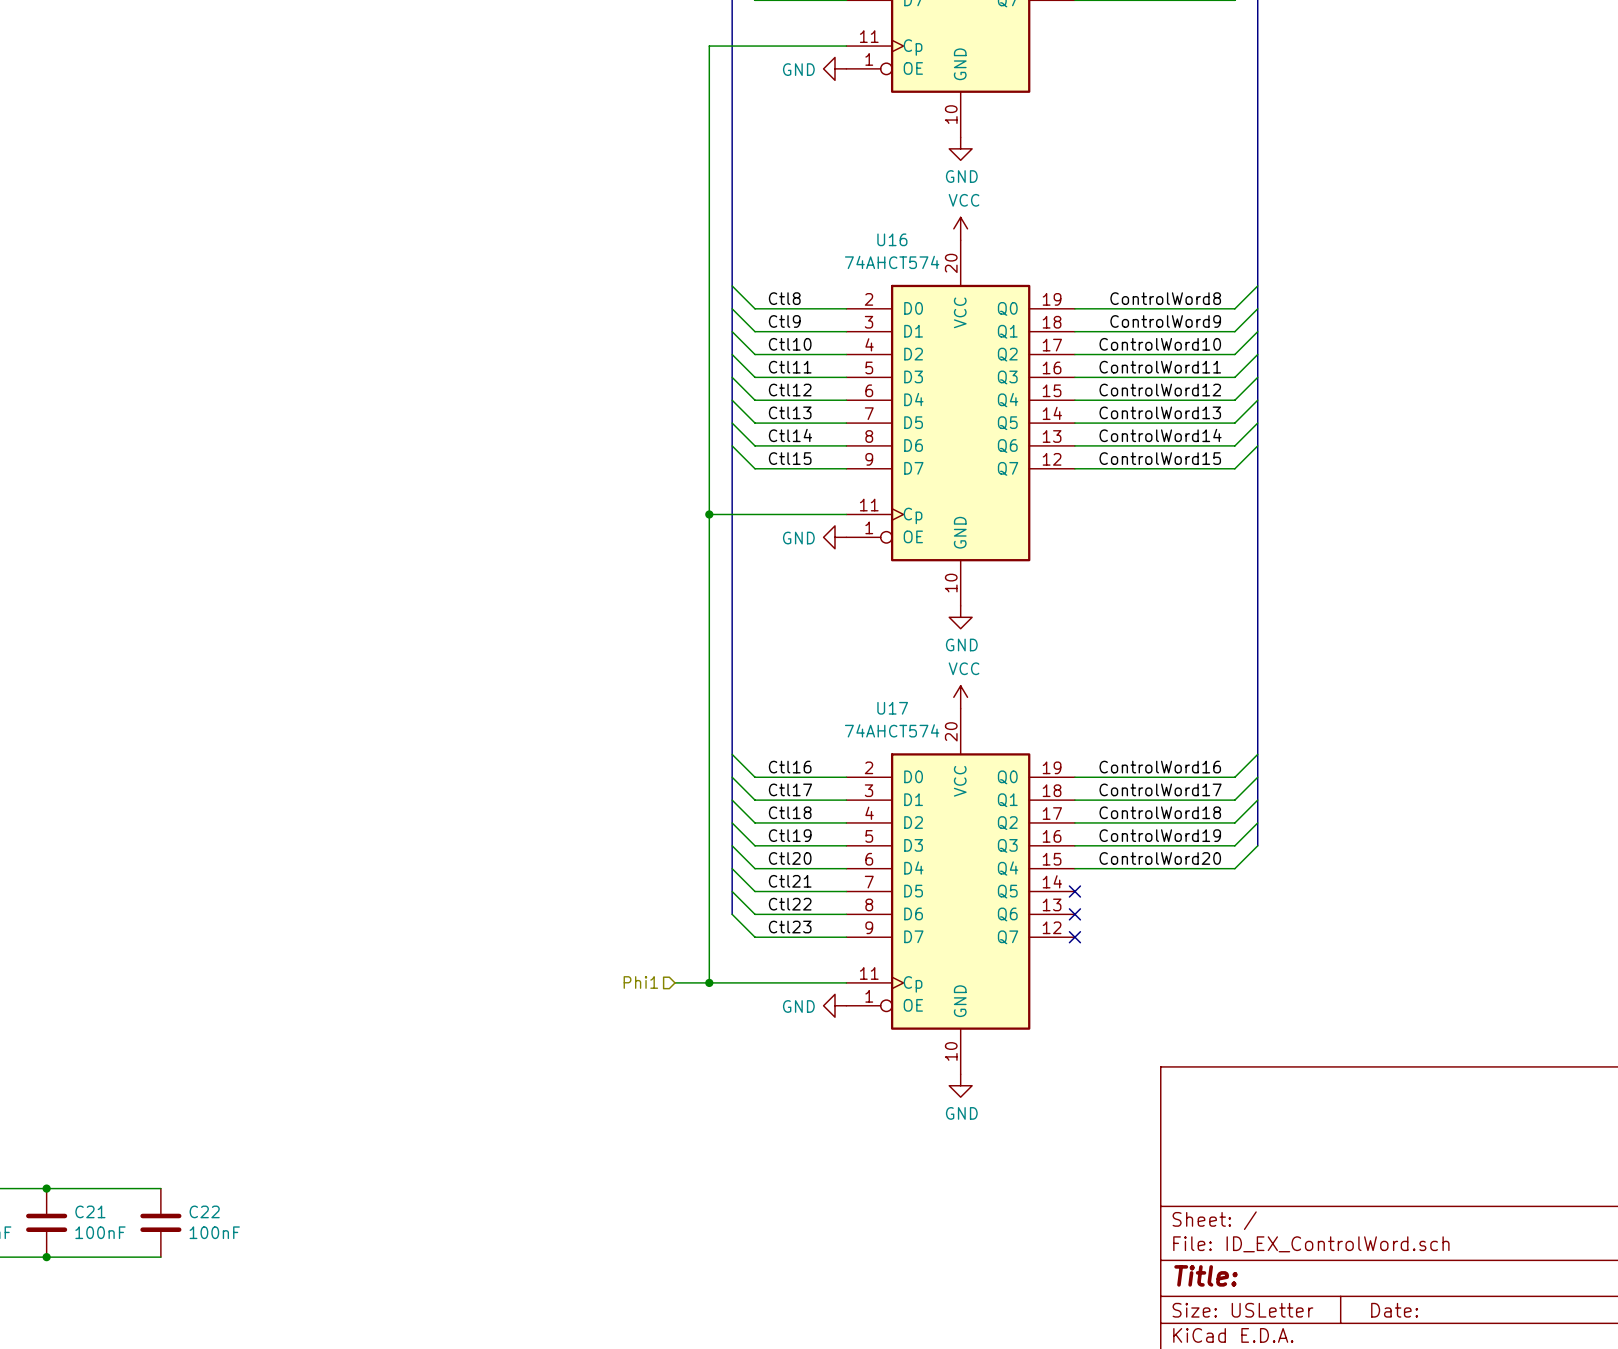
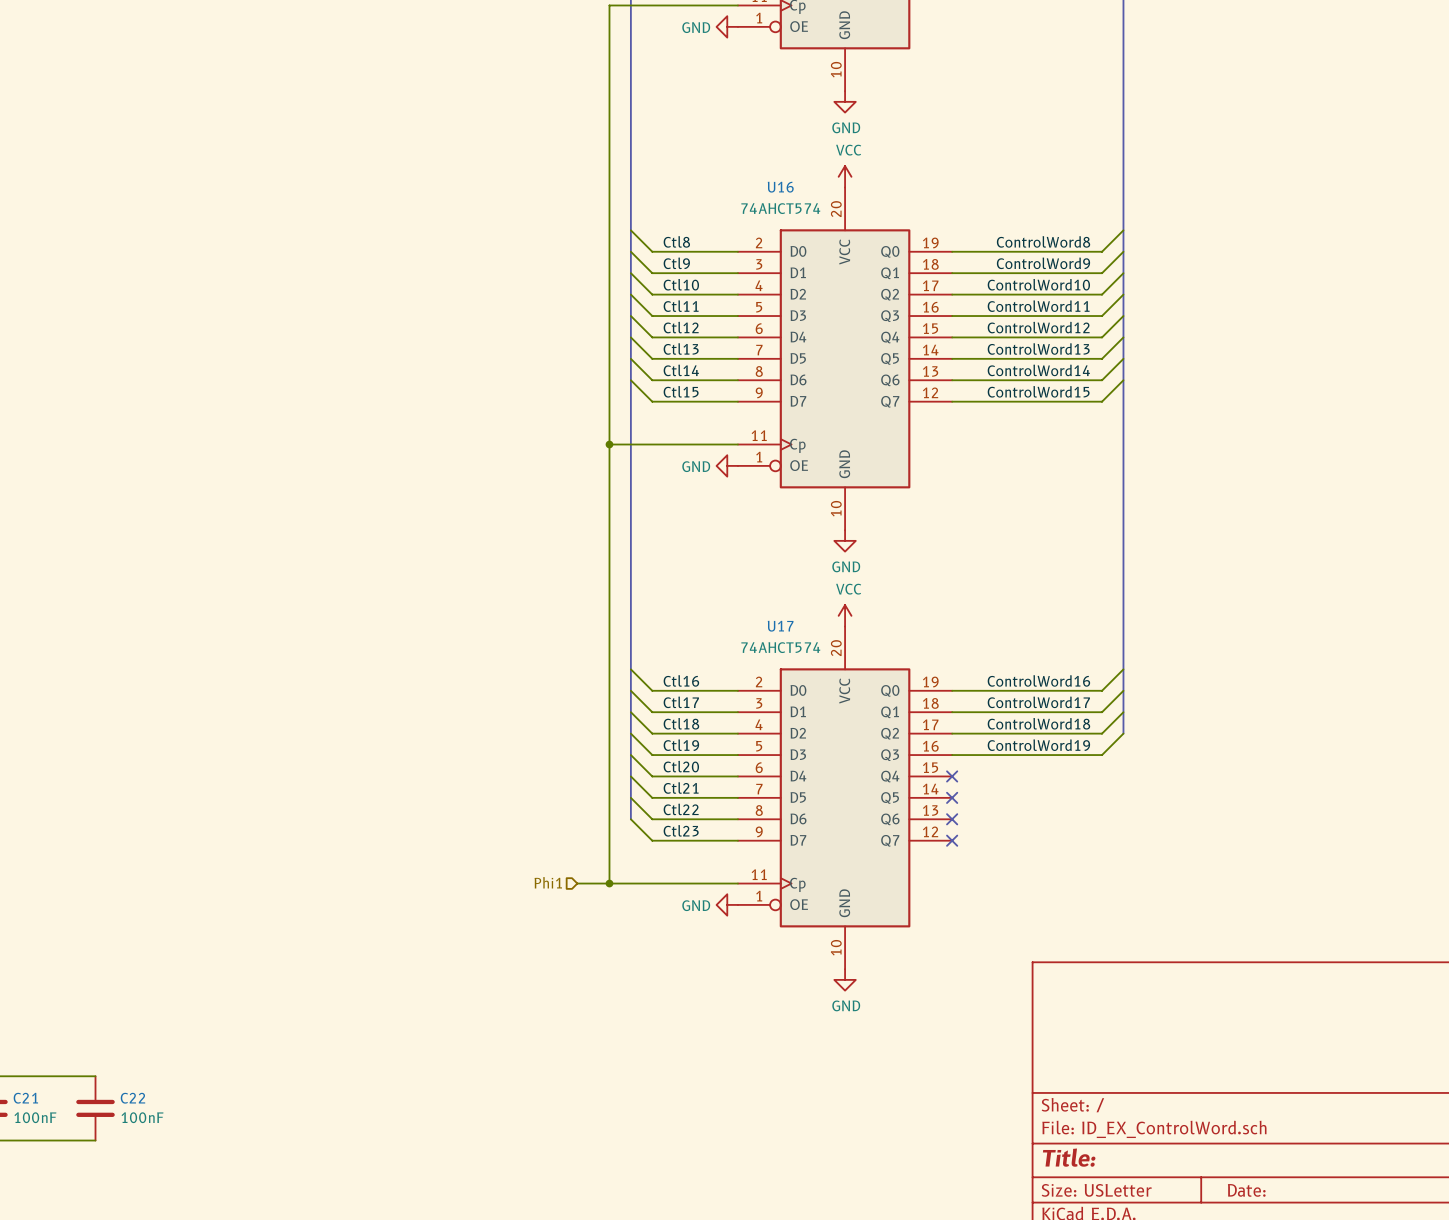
bus: (1257, 822) (1257, 845) -> none
wire: (1257, 845) (1234, 868) (1074, 868) -> none
label: ControlWord20 (1160, 858) -> none
no-connect mark: none -> (952, 776)

